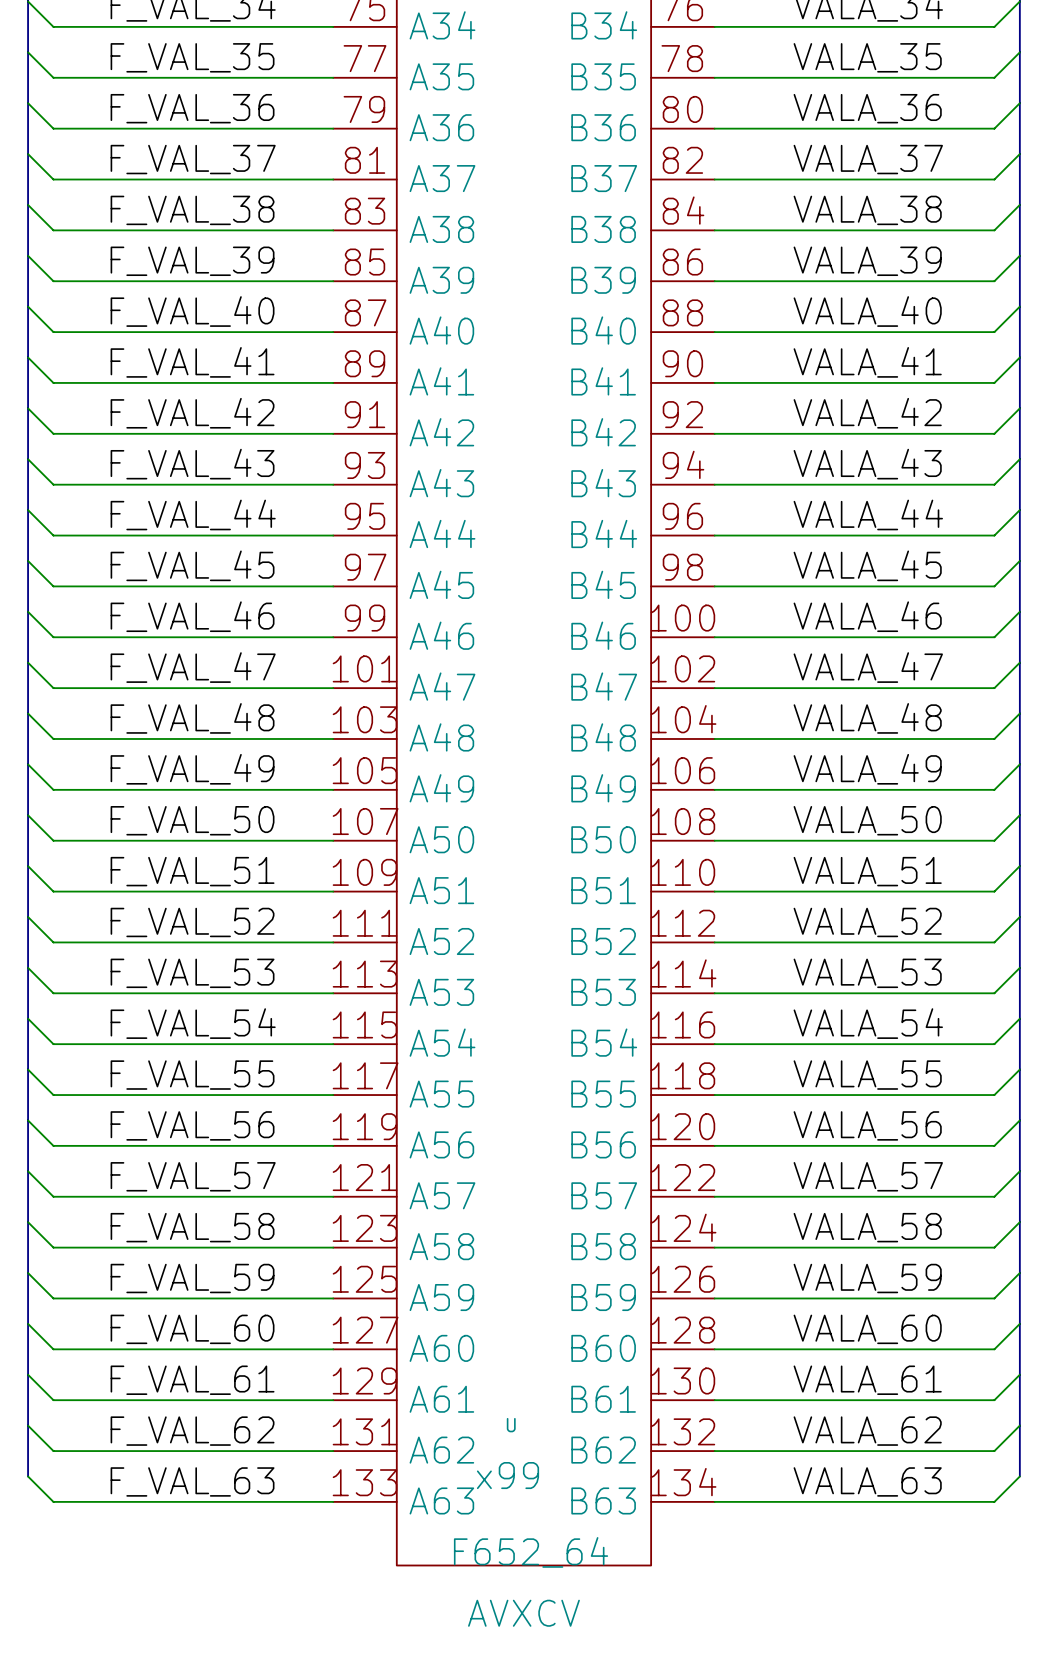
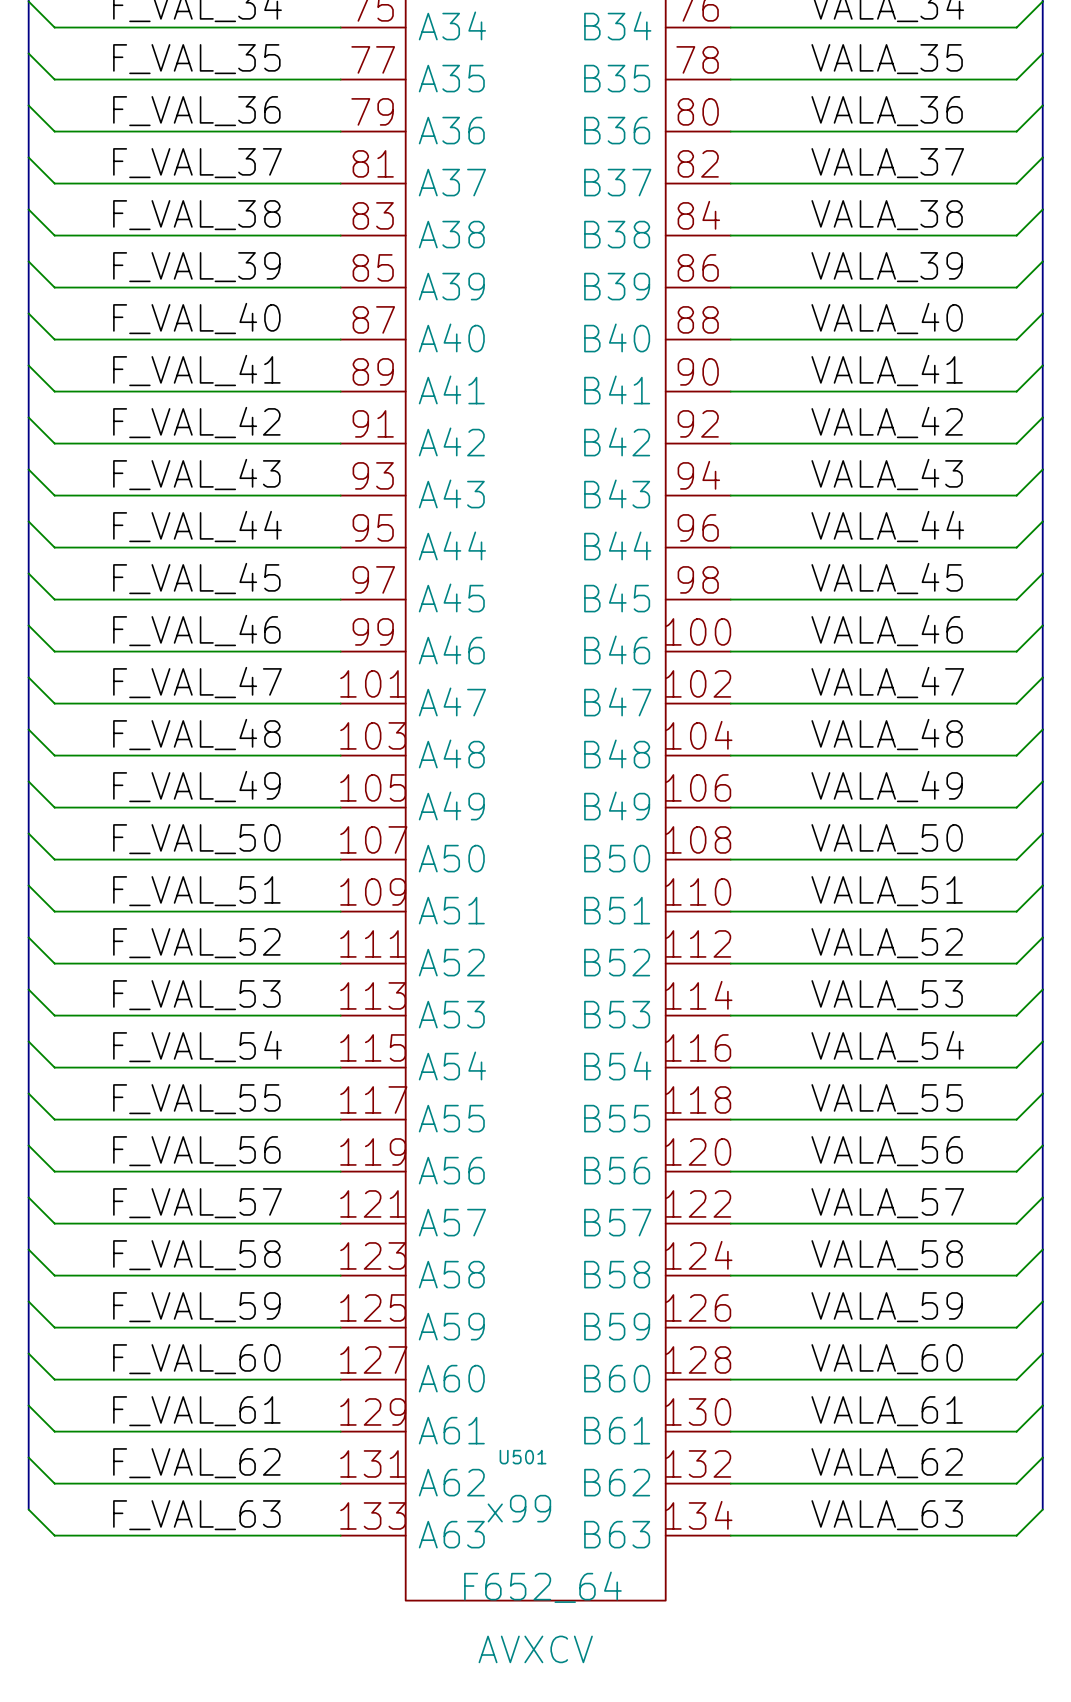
U name: U (511, 1425) -> U501 (523, 1457)

